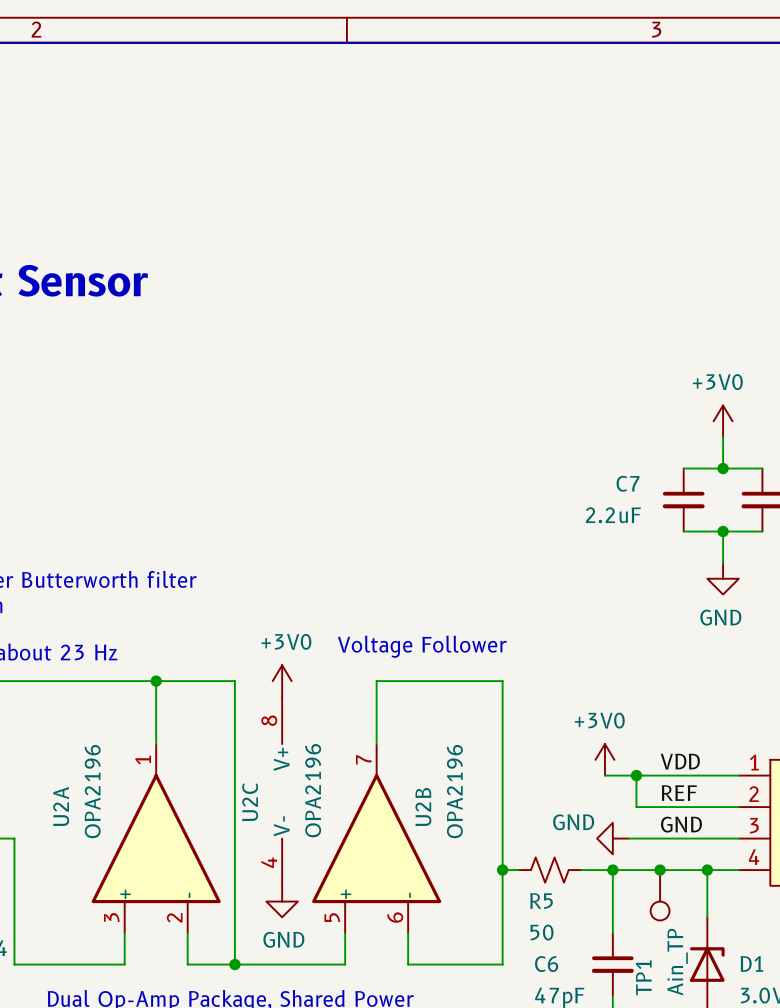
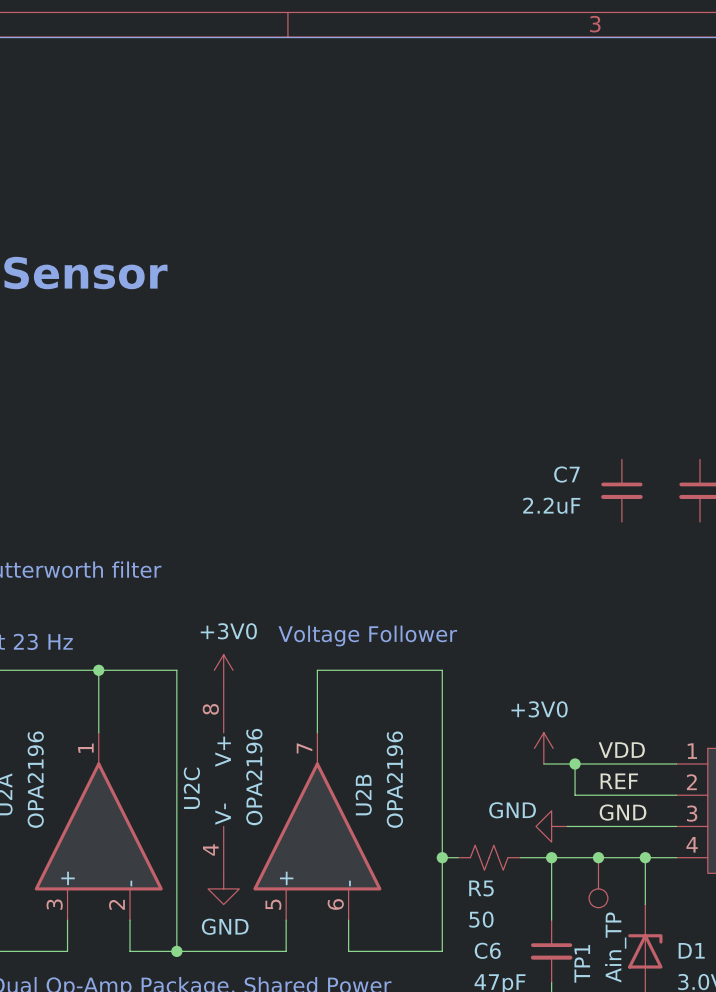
power symbol: +3V0 (723, 421) -> none
wire: (723, 437) (723, 468) -> none
wire: (683, 468) (762, 468) -> none
junction: (723, 468) -> none
wire: (683, 531) (762, 531) -> none
wire: (723, 531) (723, 563) -> none
junction: (723, 531) -> none
power symbol: GND (723, 578) -> none

